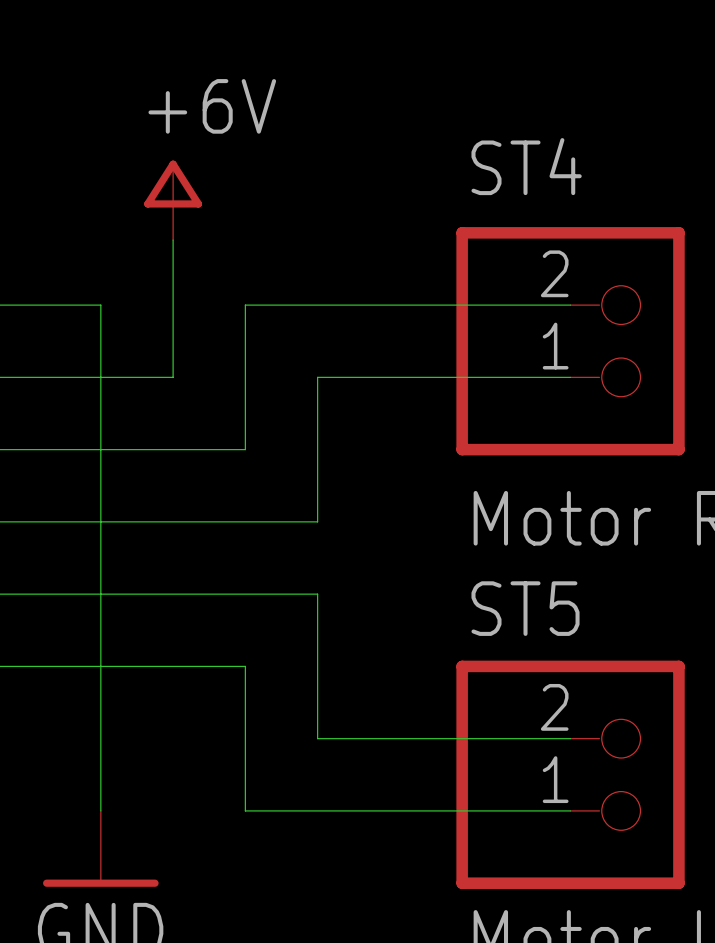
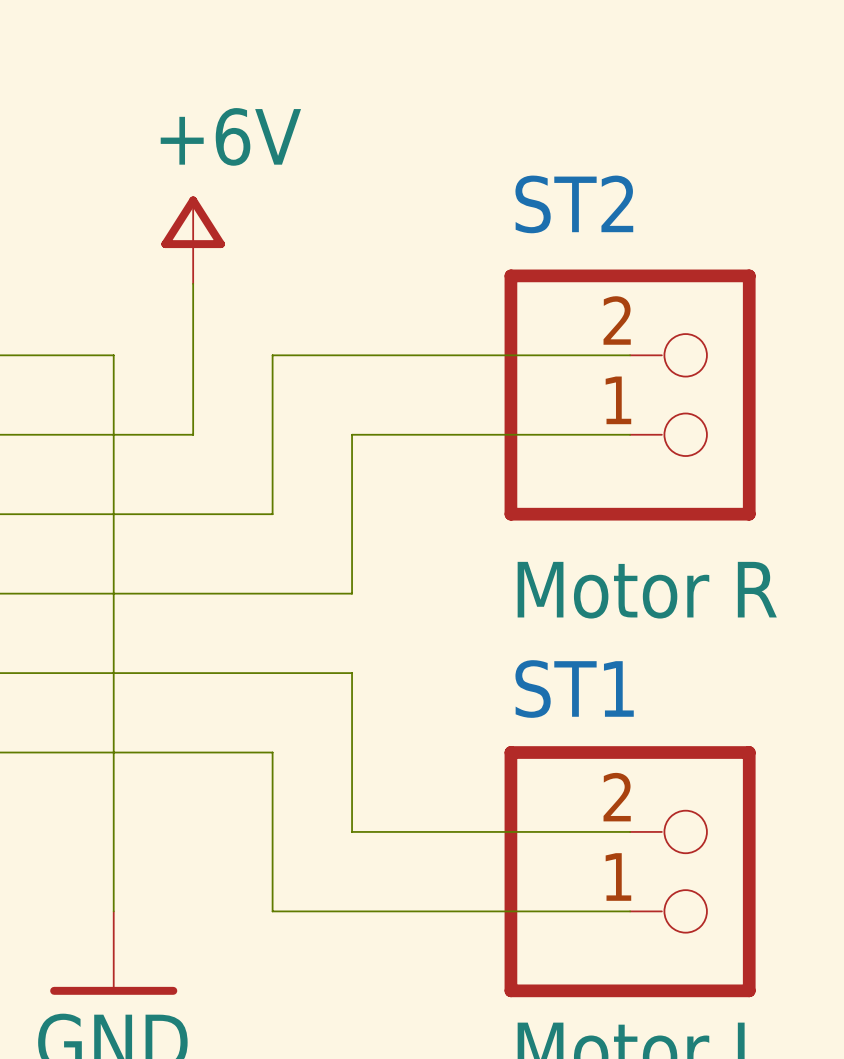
ST4 name: ST4 (526, 166) -> ST2 (574, 204)
ST5 name: ST5 (525, 608) -> ST1 (574, 689)

